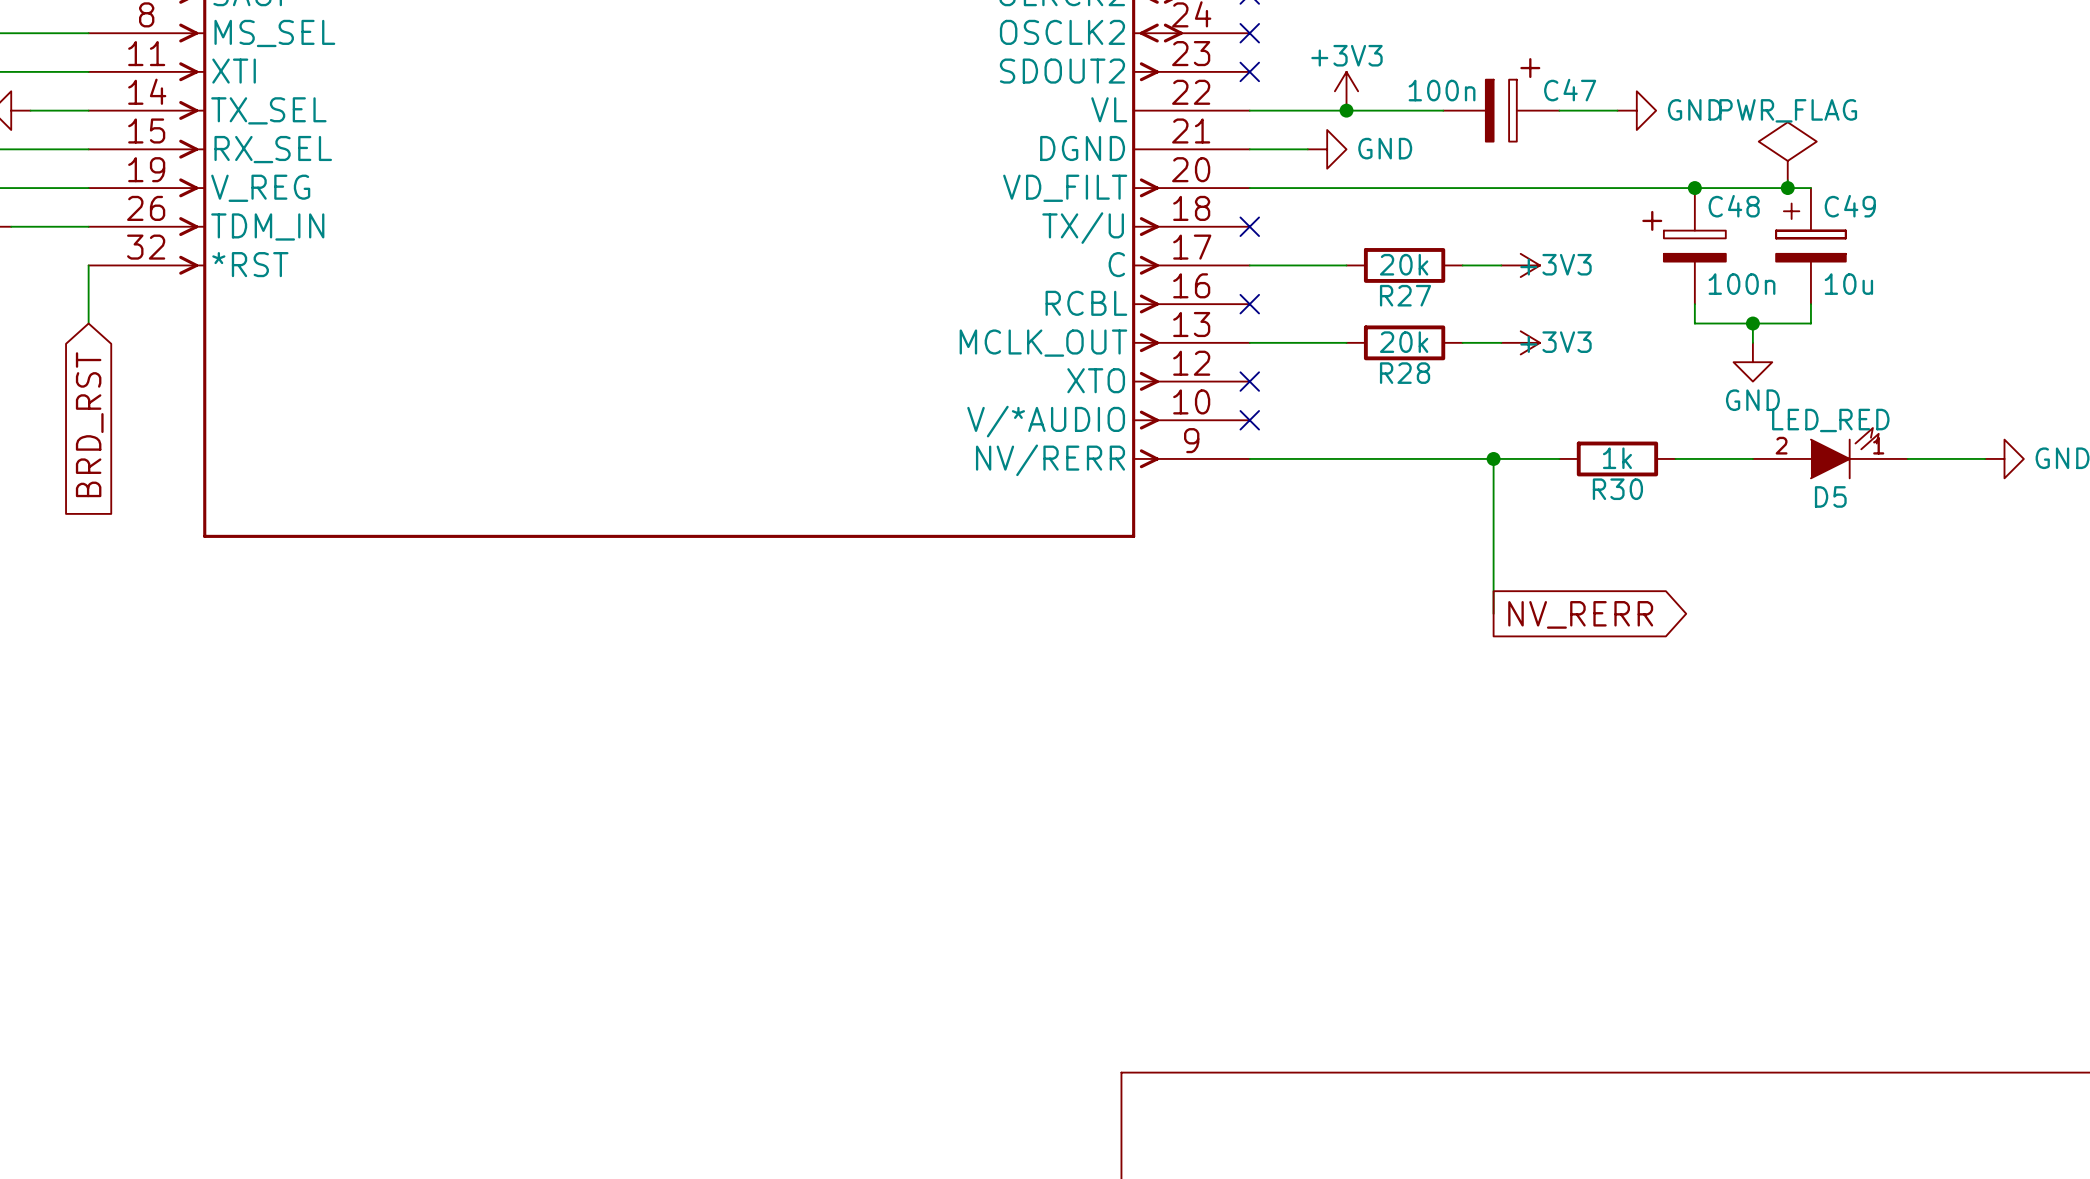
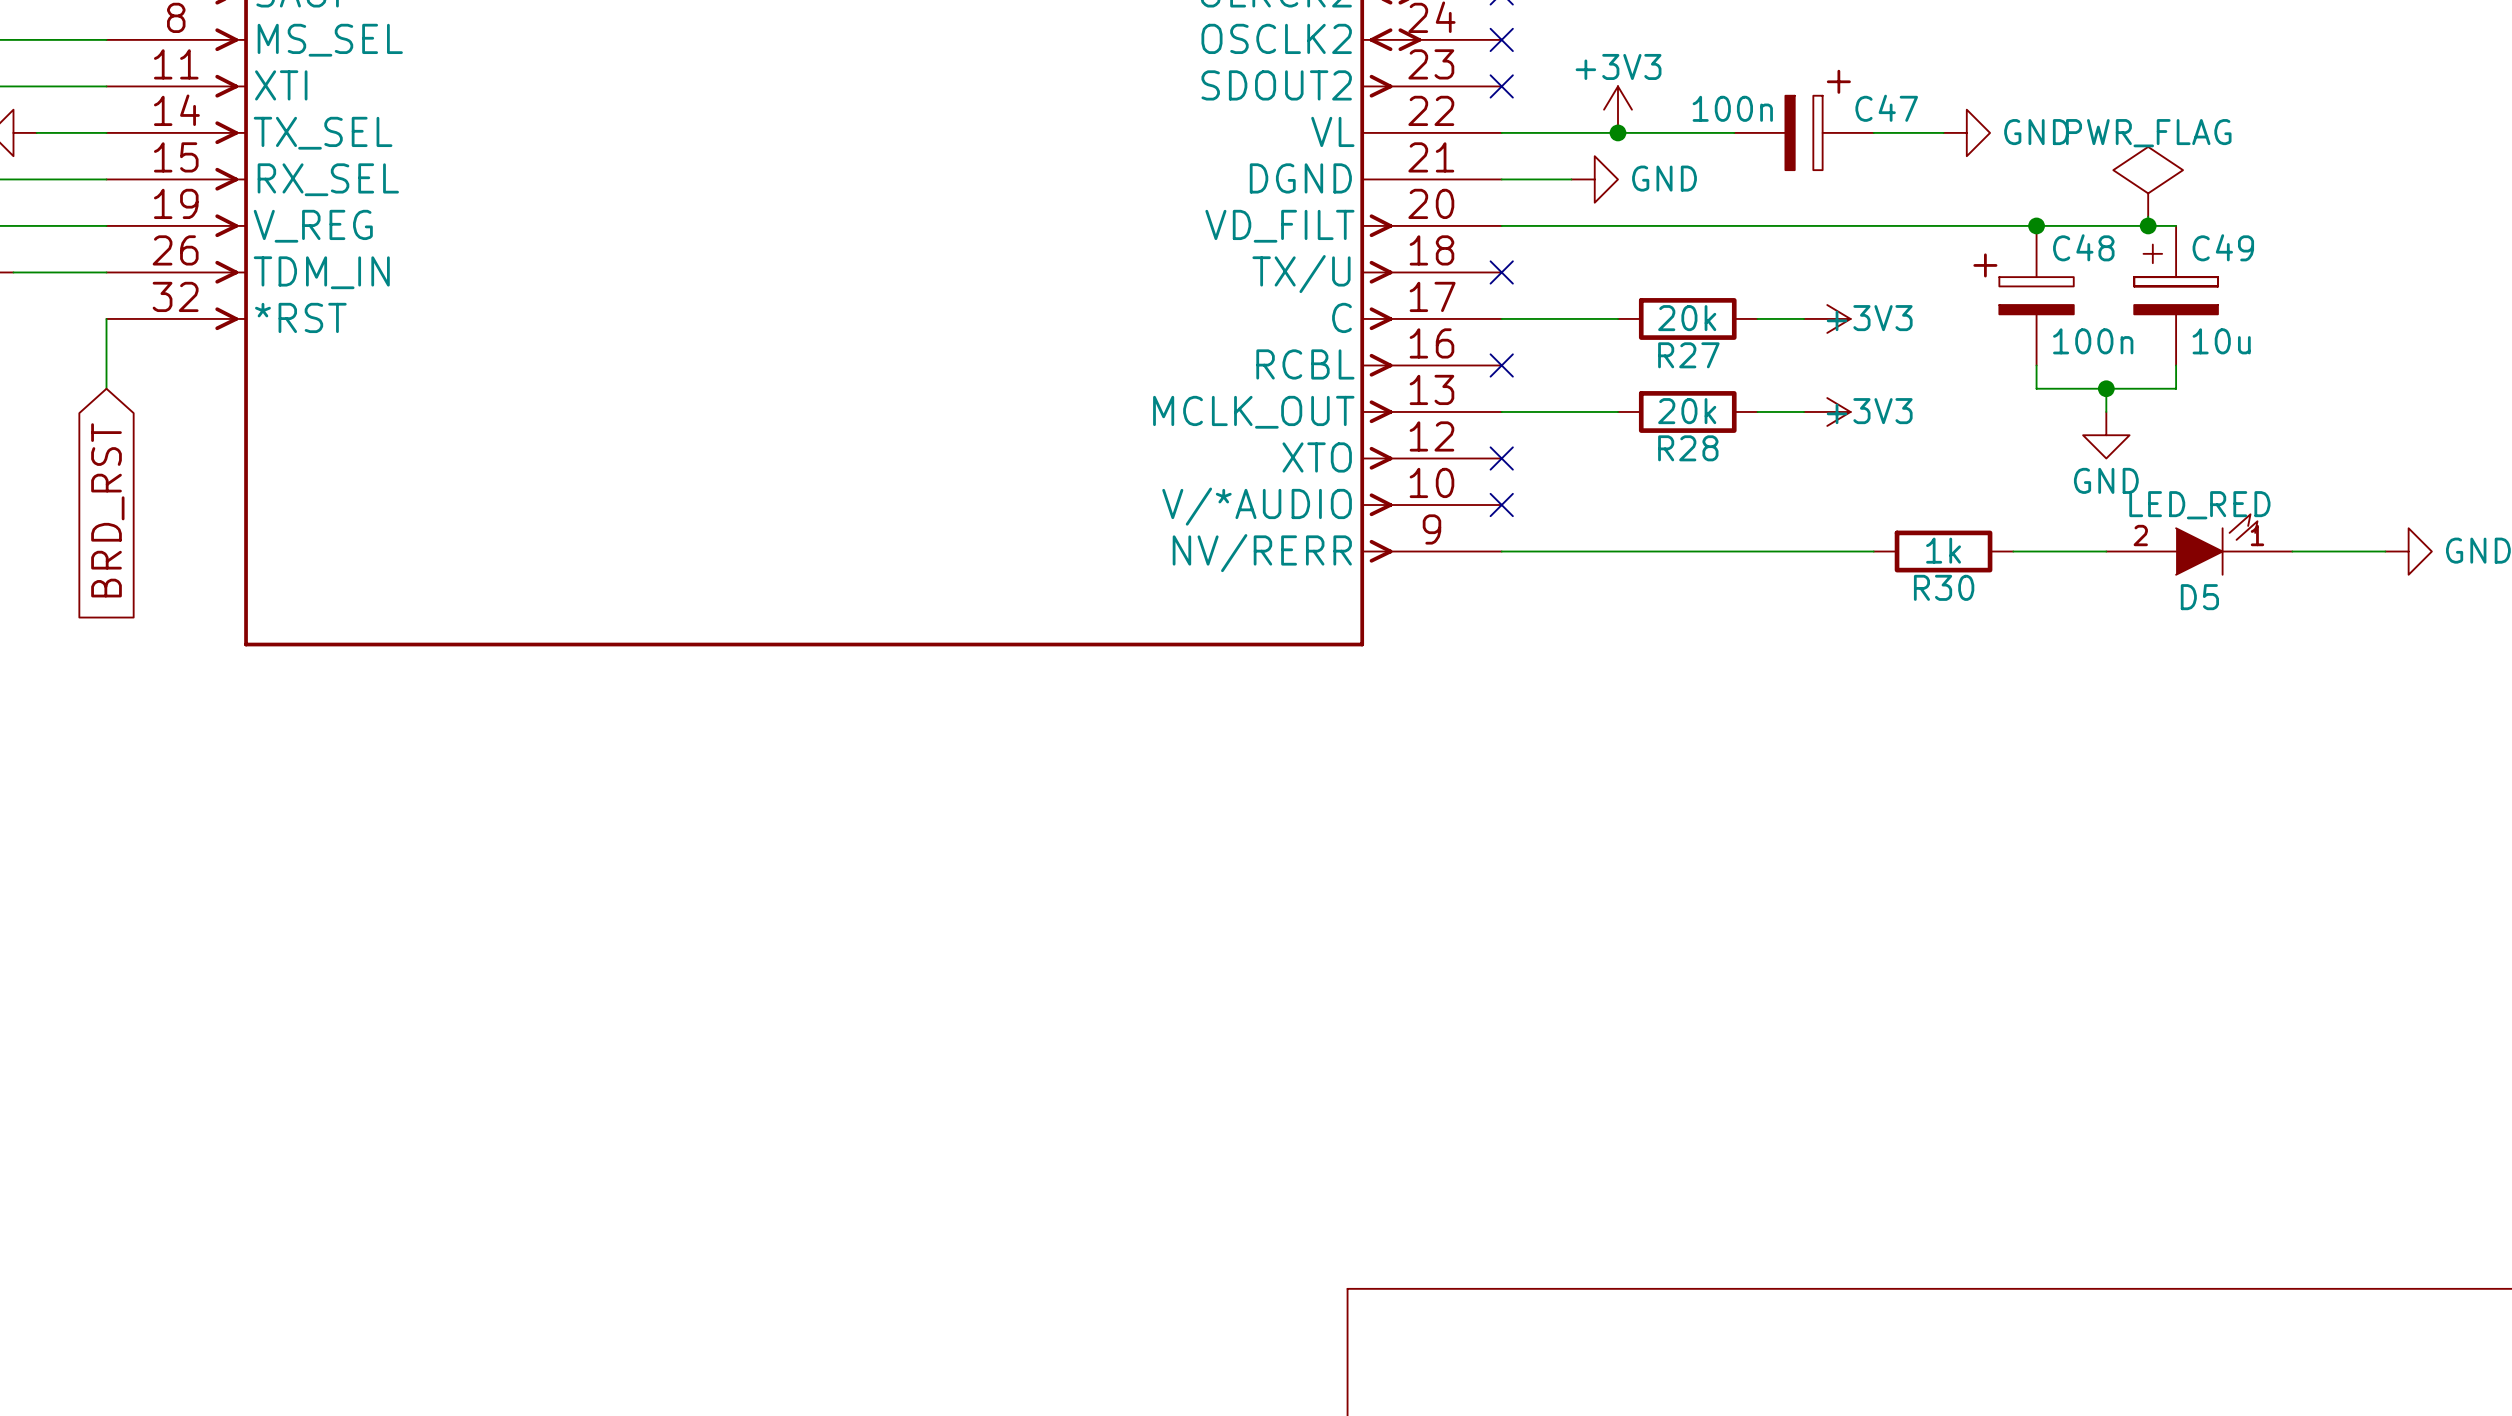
wire: (1493, 458) (1493, 613) -> none
junction: (1493, 458) -> none
global label: NV_RERR (1580, 614) -> none

